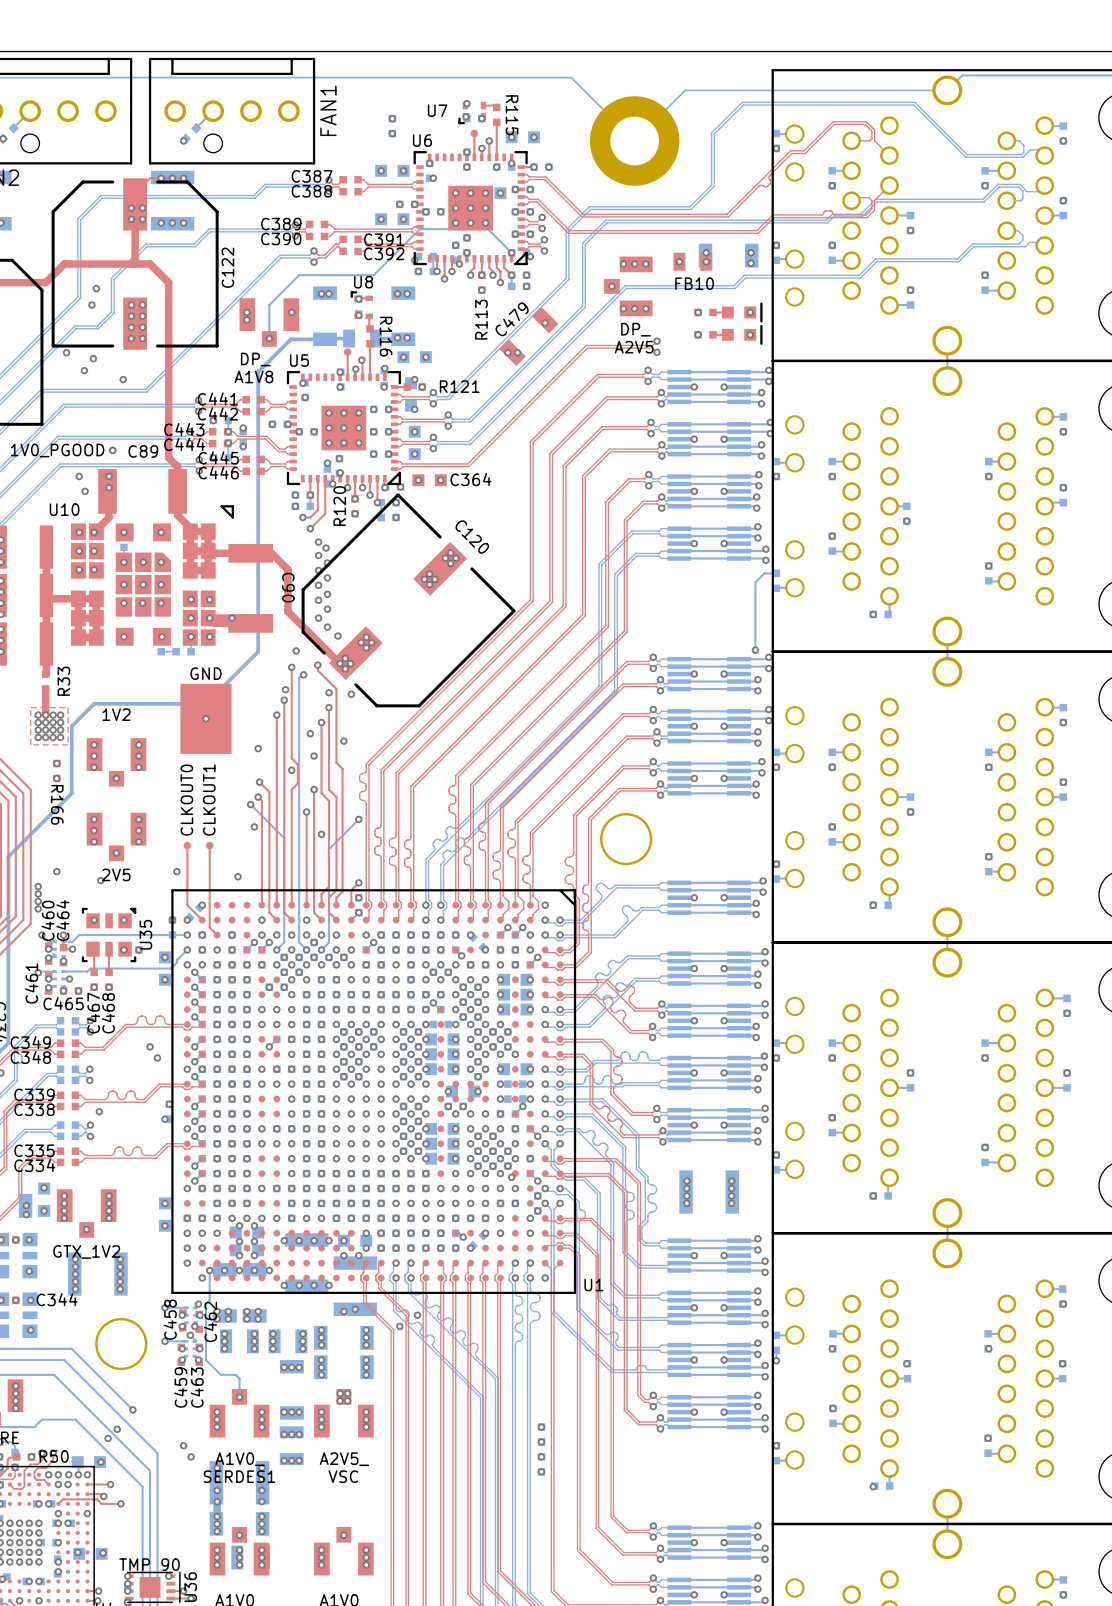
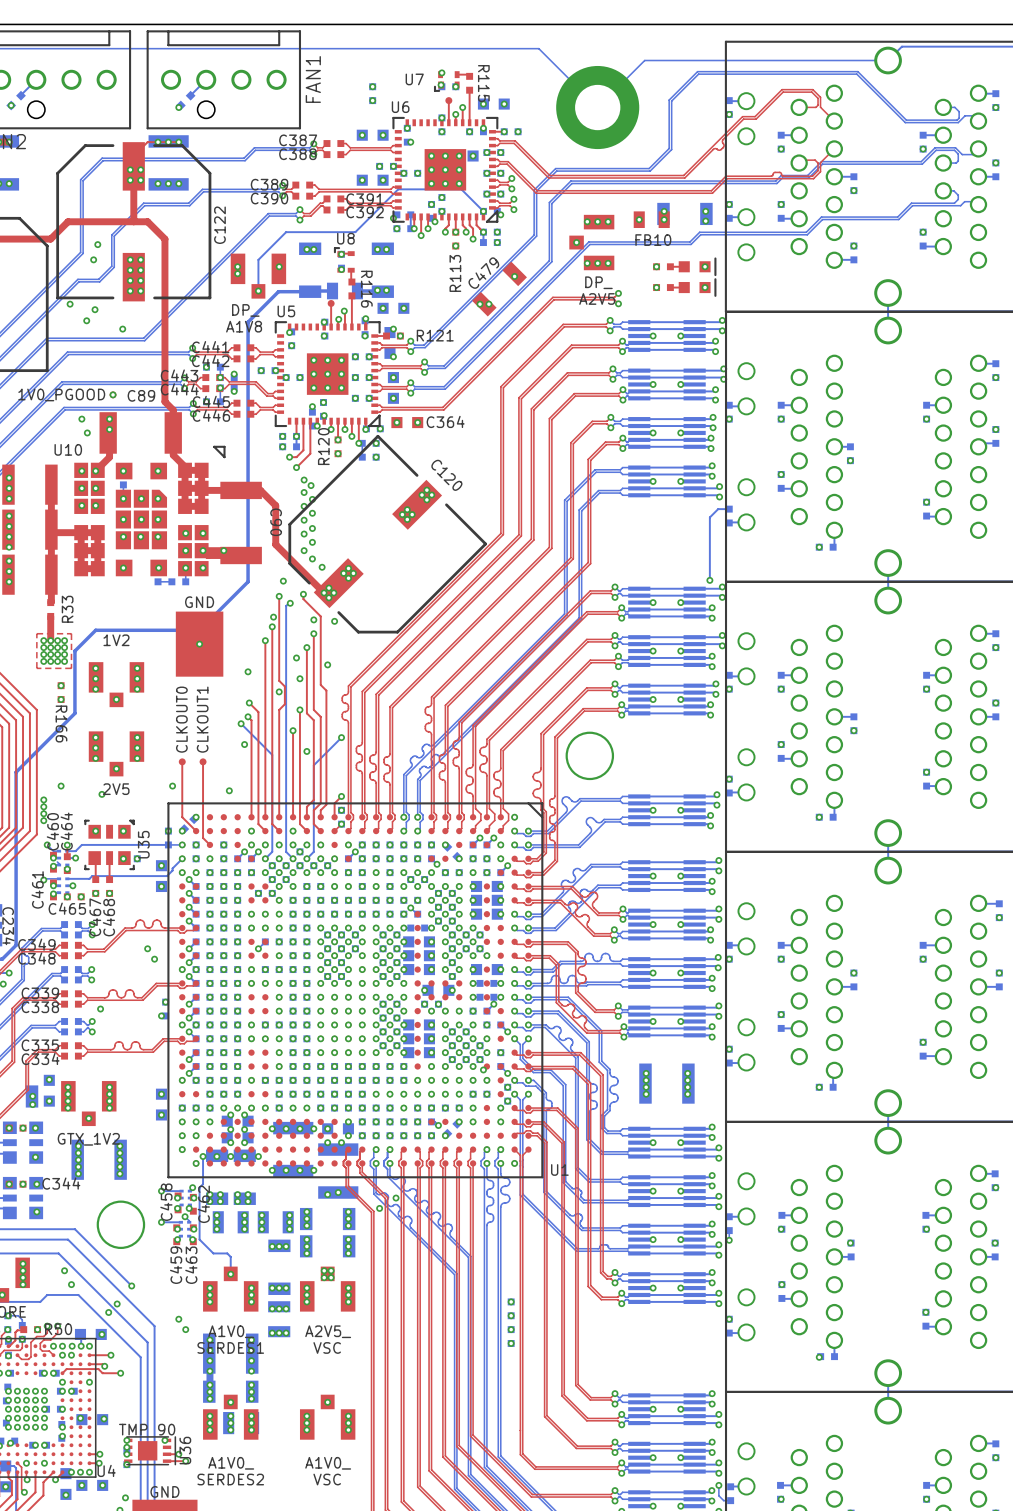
via: none -> (64, 1270)
via: none -> (71, 1284)

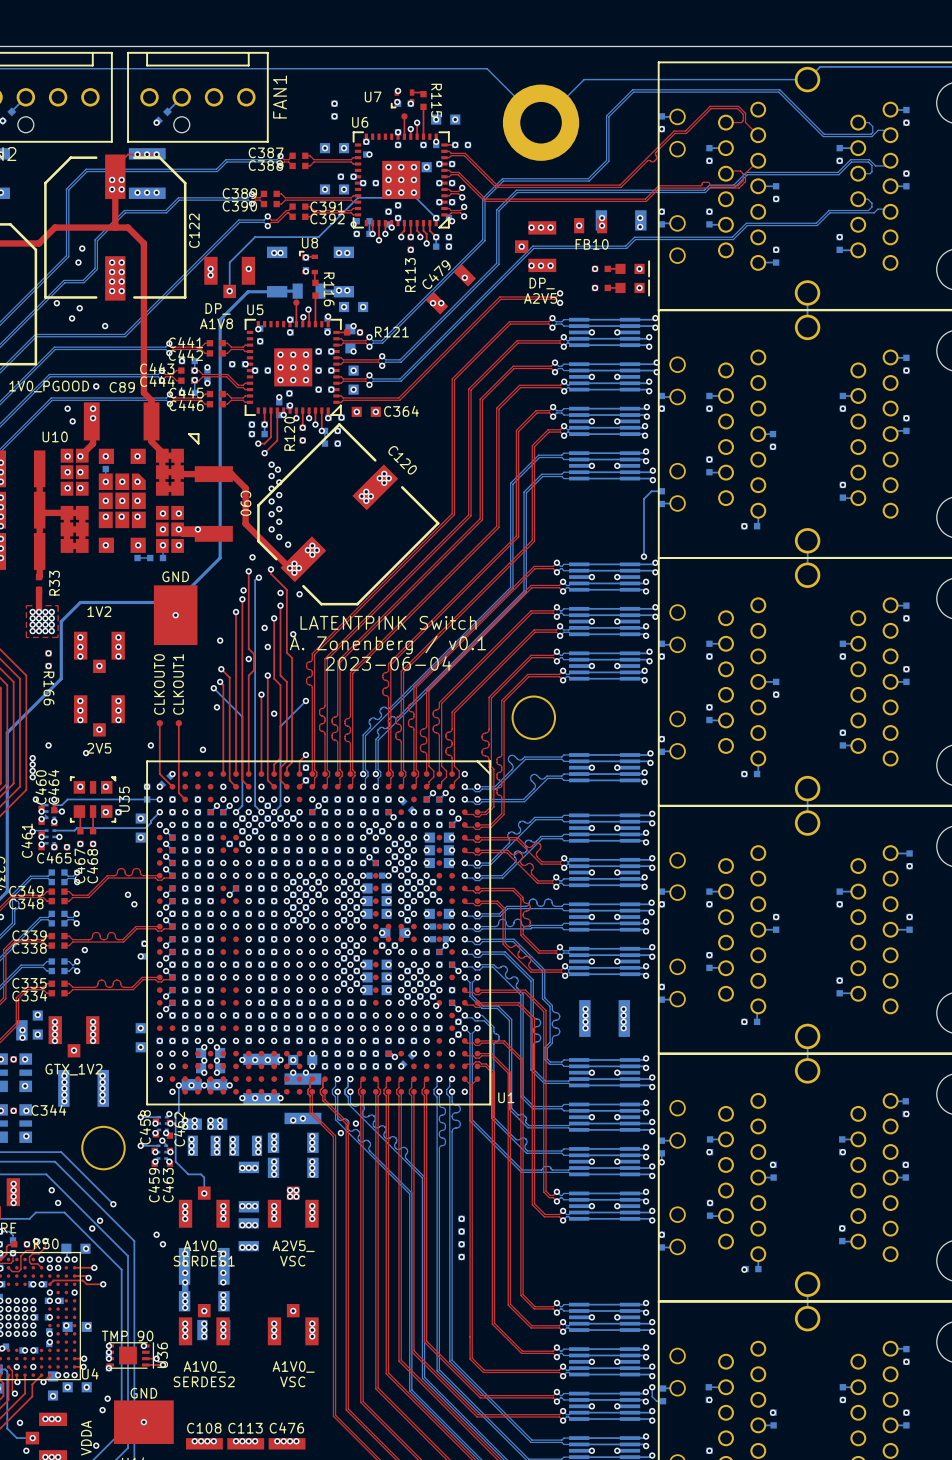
text: none -> LATENTPINK Switch (388, 622)
text: none -> A. Zonenberg / v0.1 (387, 645)
text: none -> 2023-06-04 (388, 663)

